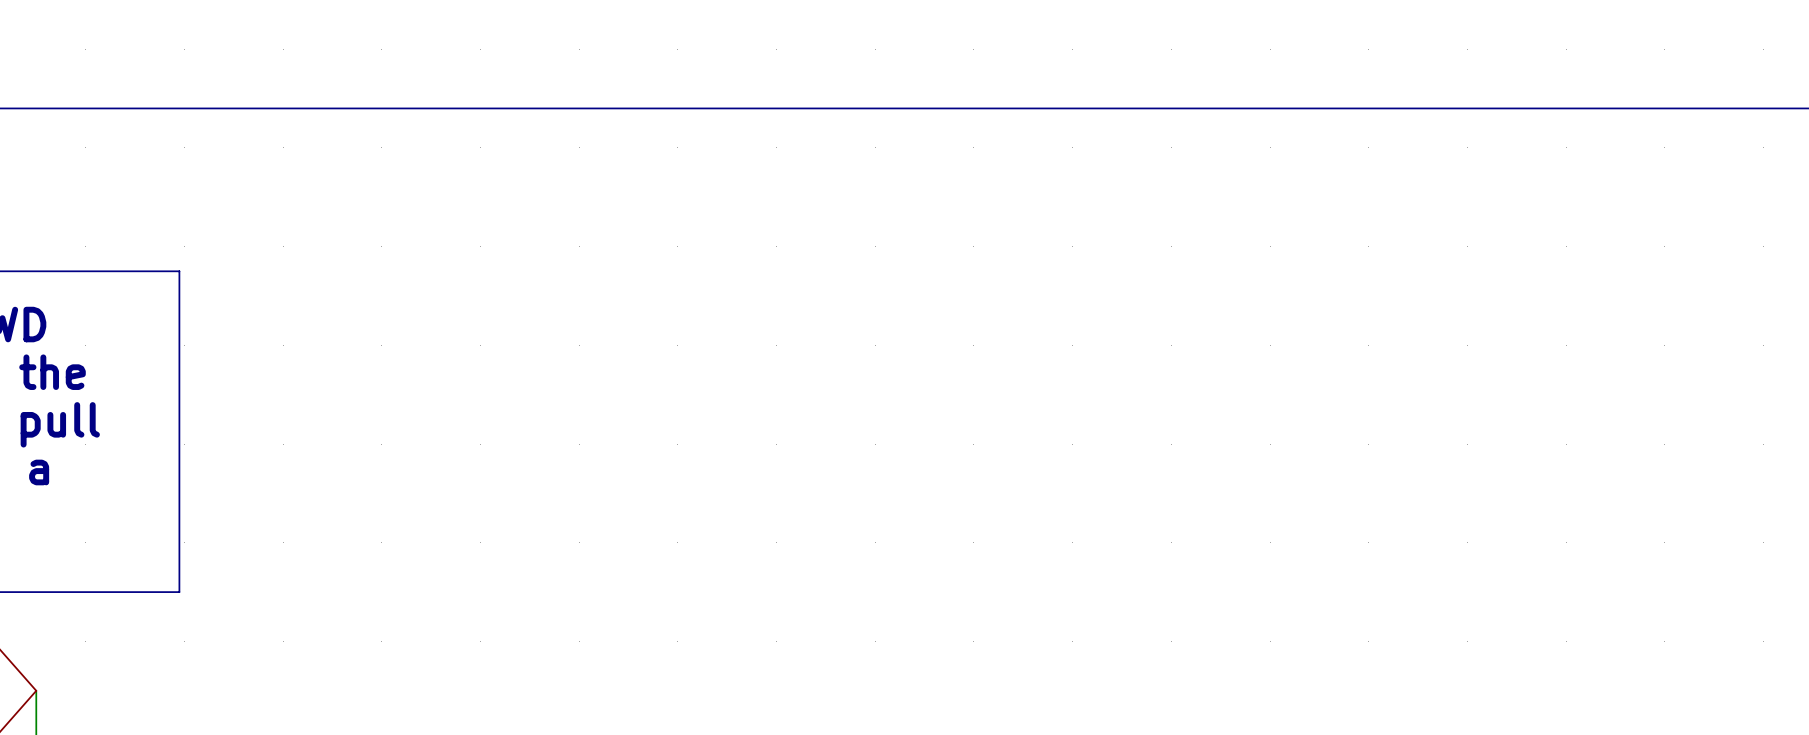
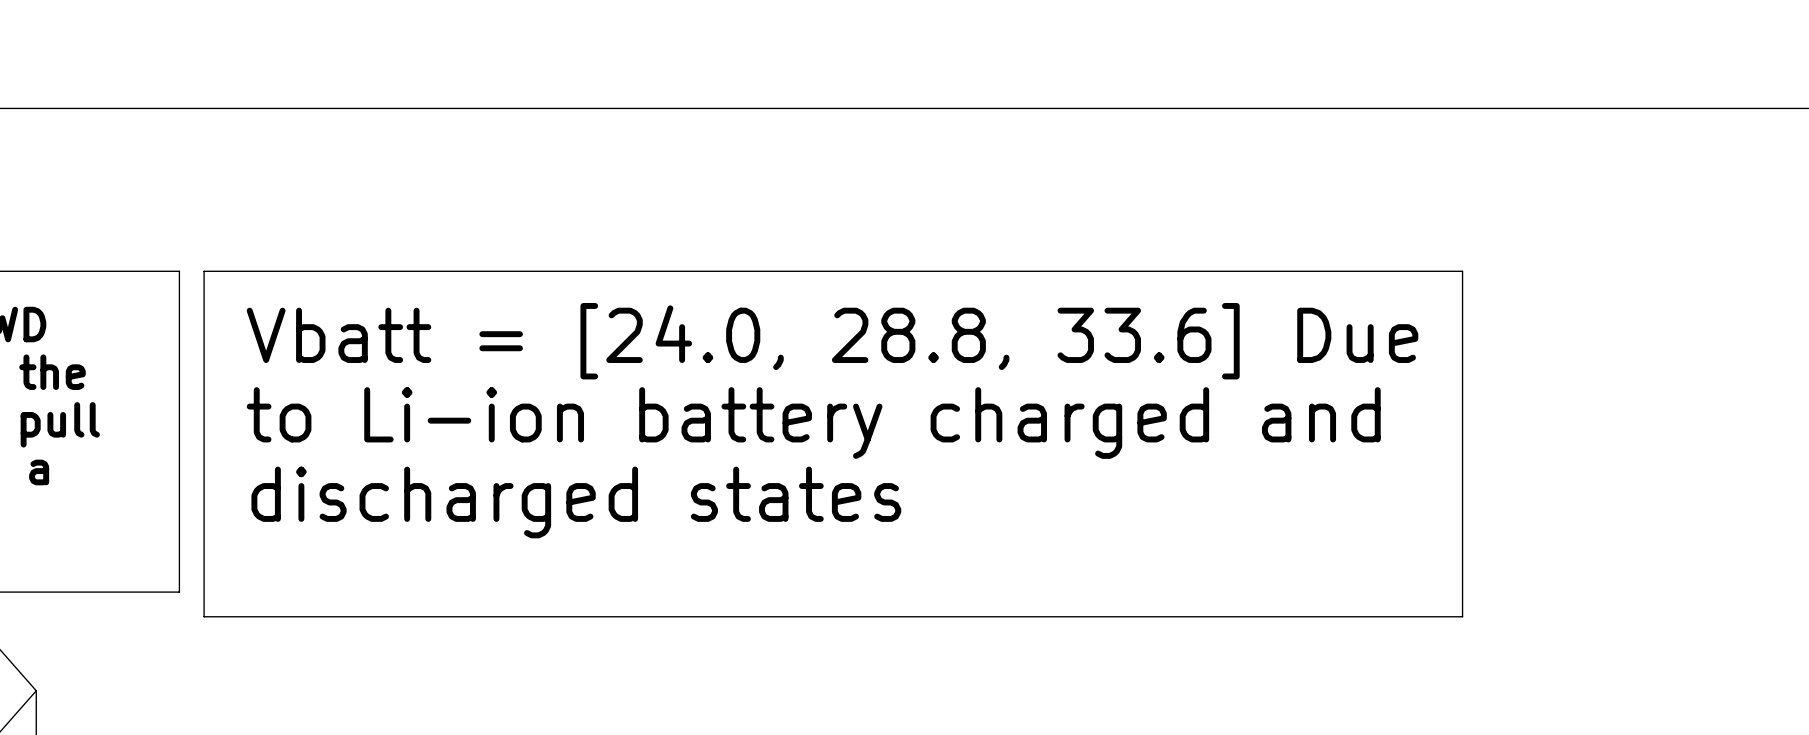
line: none -> (204, 271) (1462, 271) (1462, 616) (204, 616) (204, 271)
text: none -> Vbatt = [24.0, 28.8, 33.6] Due (832, 341)
text: none -> to Li-ion battery charged and (813, 423)
text: none -> discharged states (576, 502)

